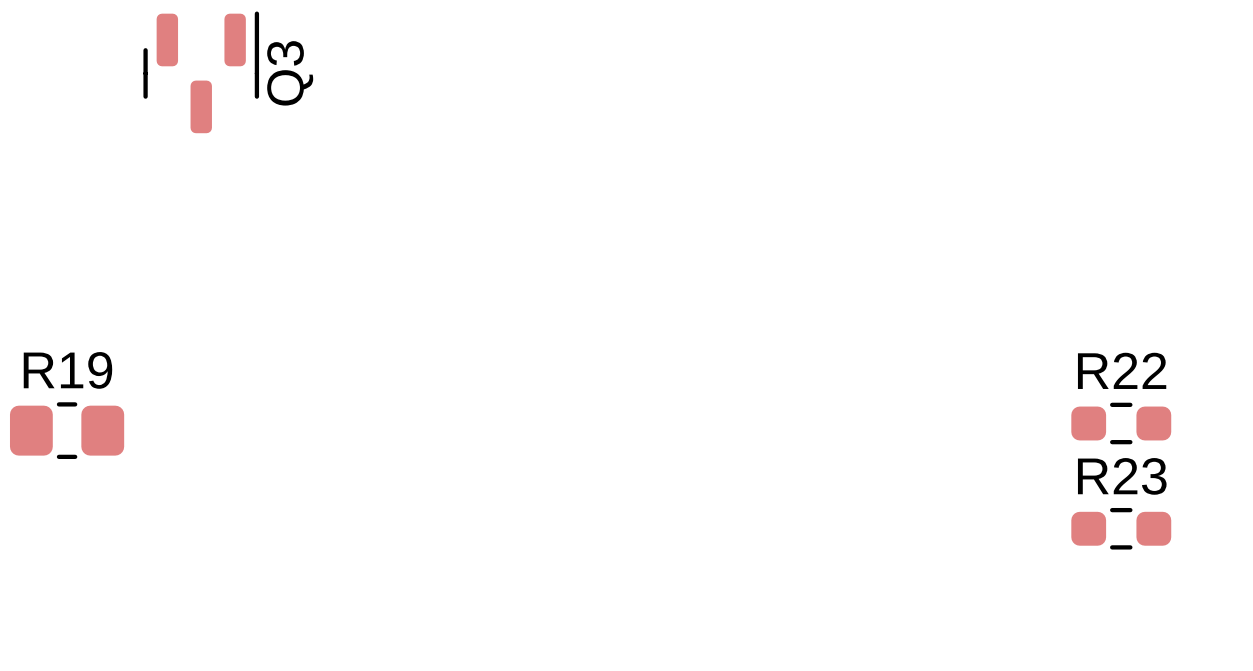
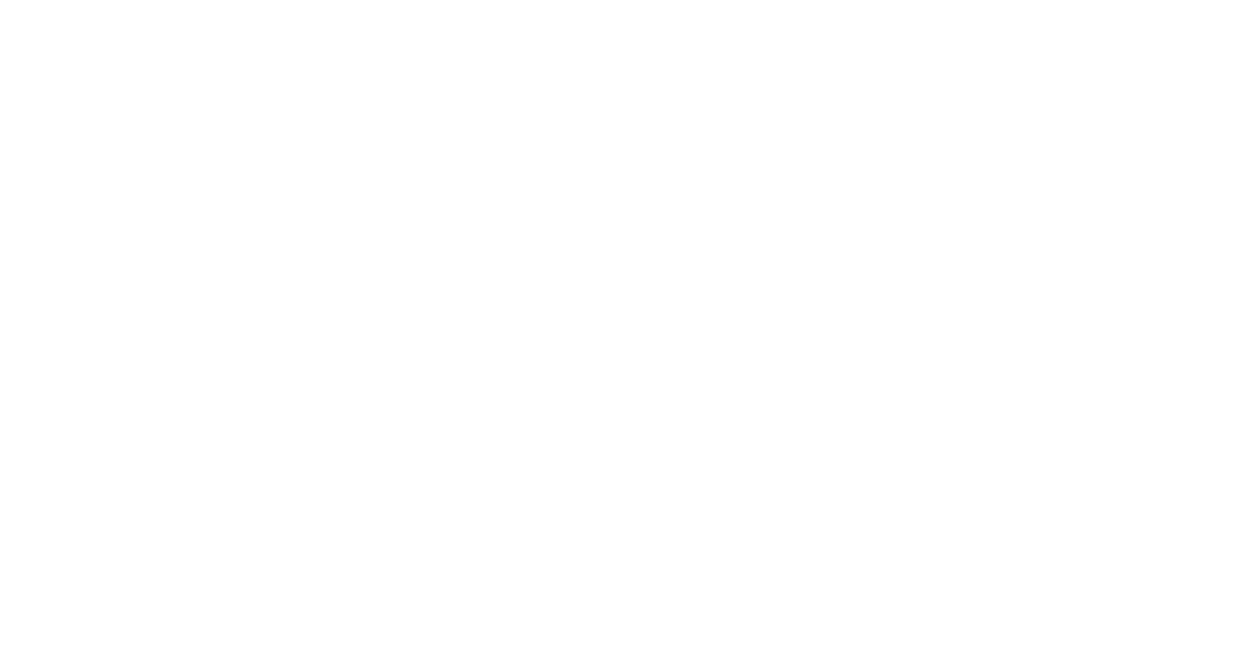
Q3: (201, 72) -> none
R22: (1121, 423) -> none
R19: (67, 430) -> none
R23: (1121, 528) -> none

